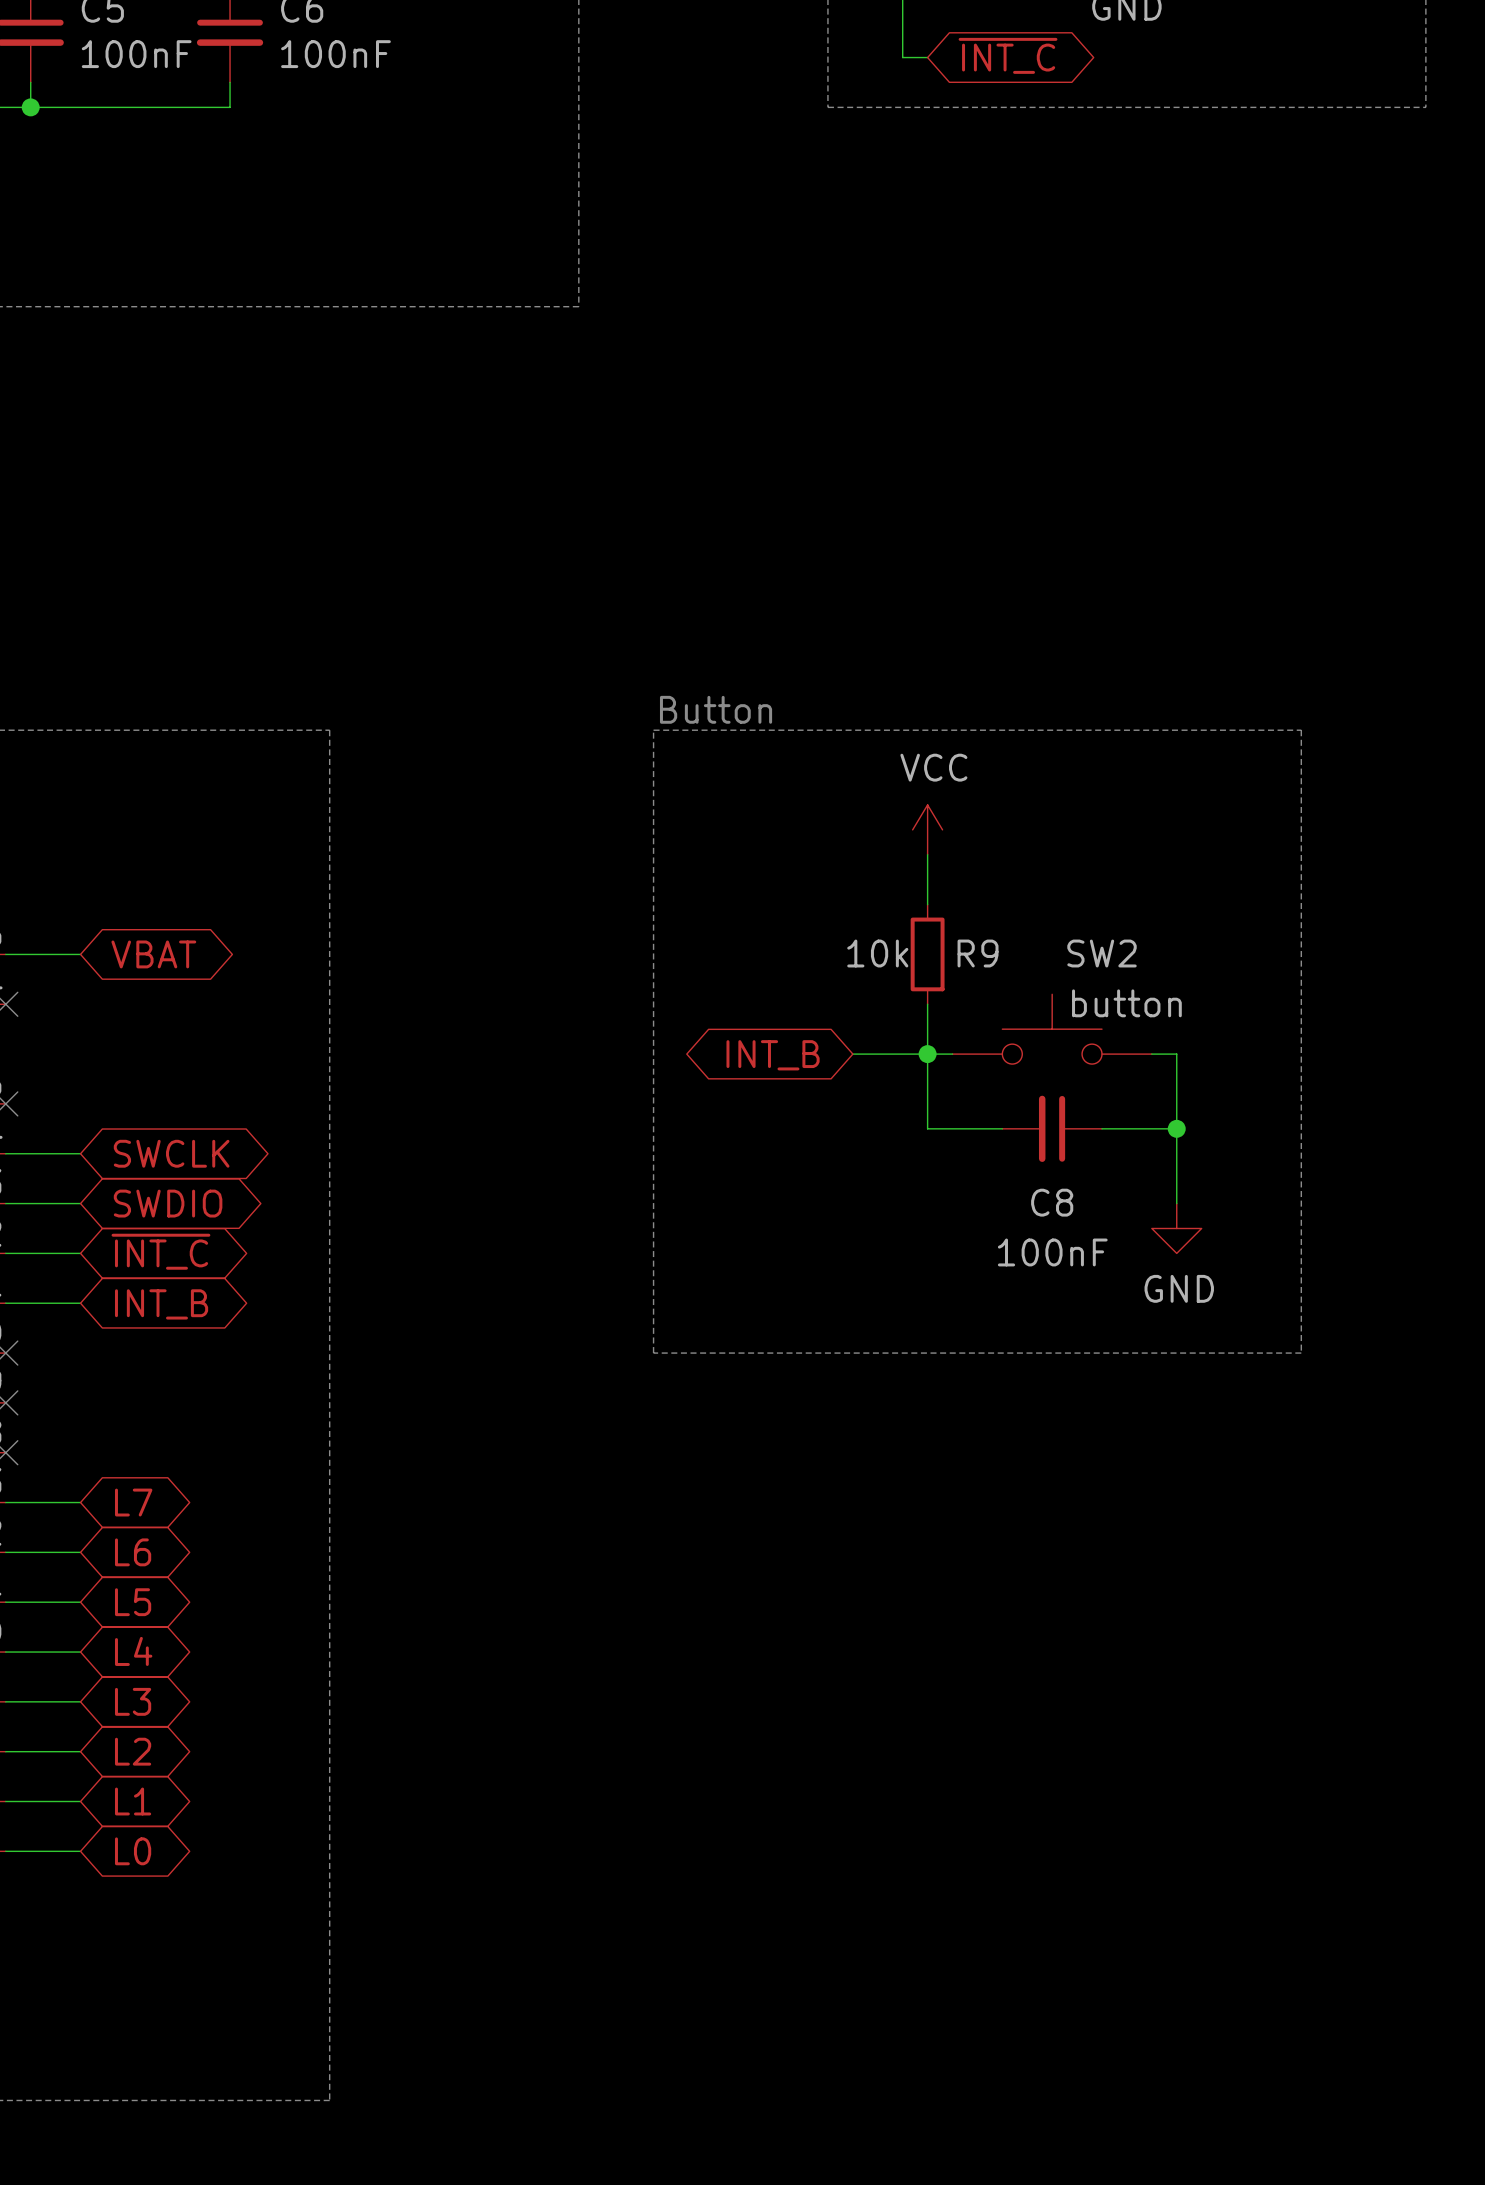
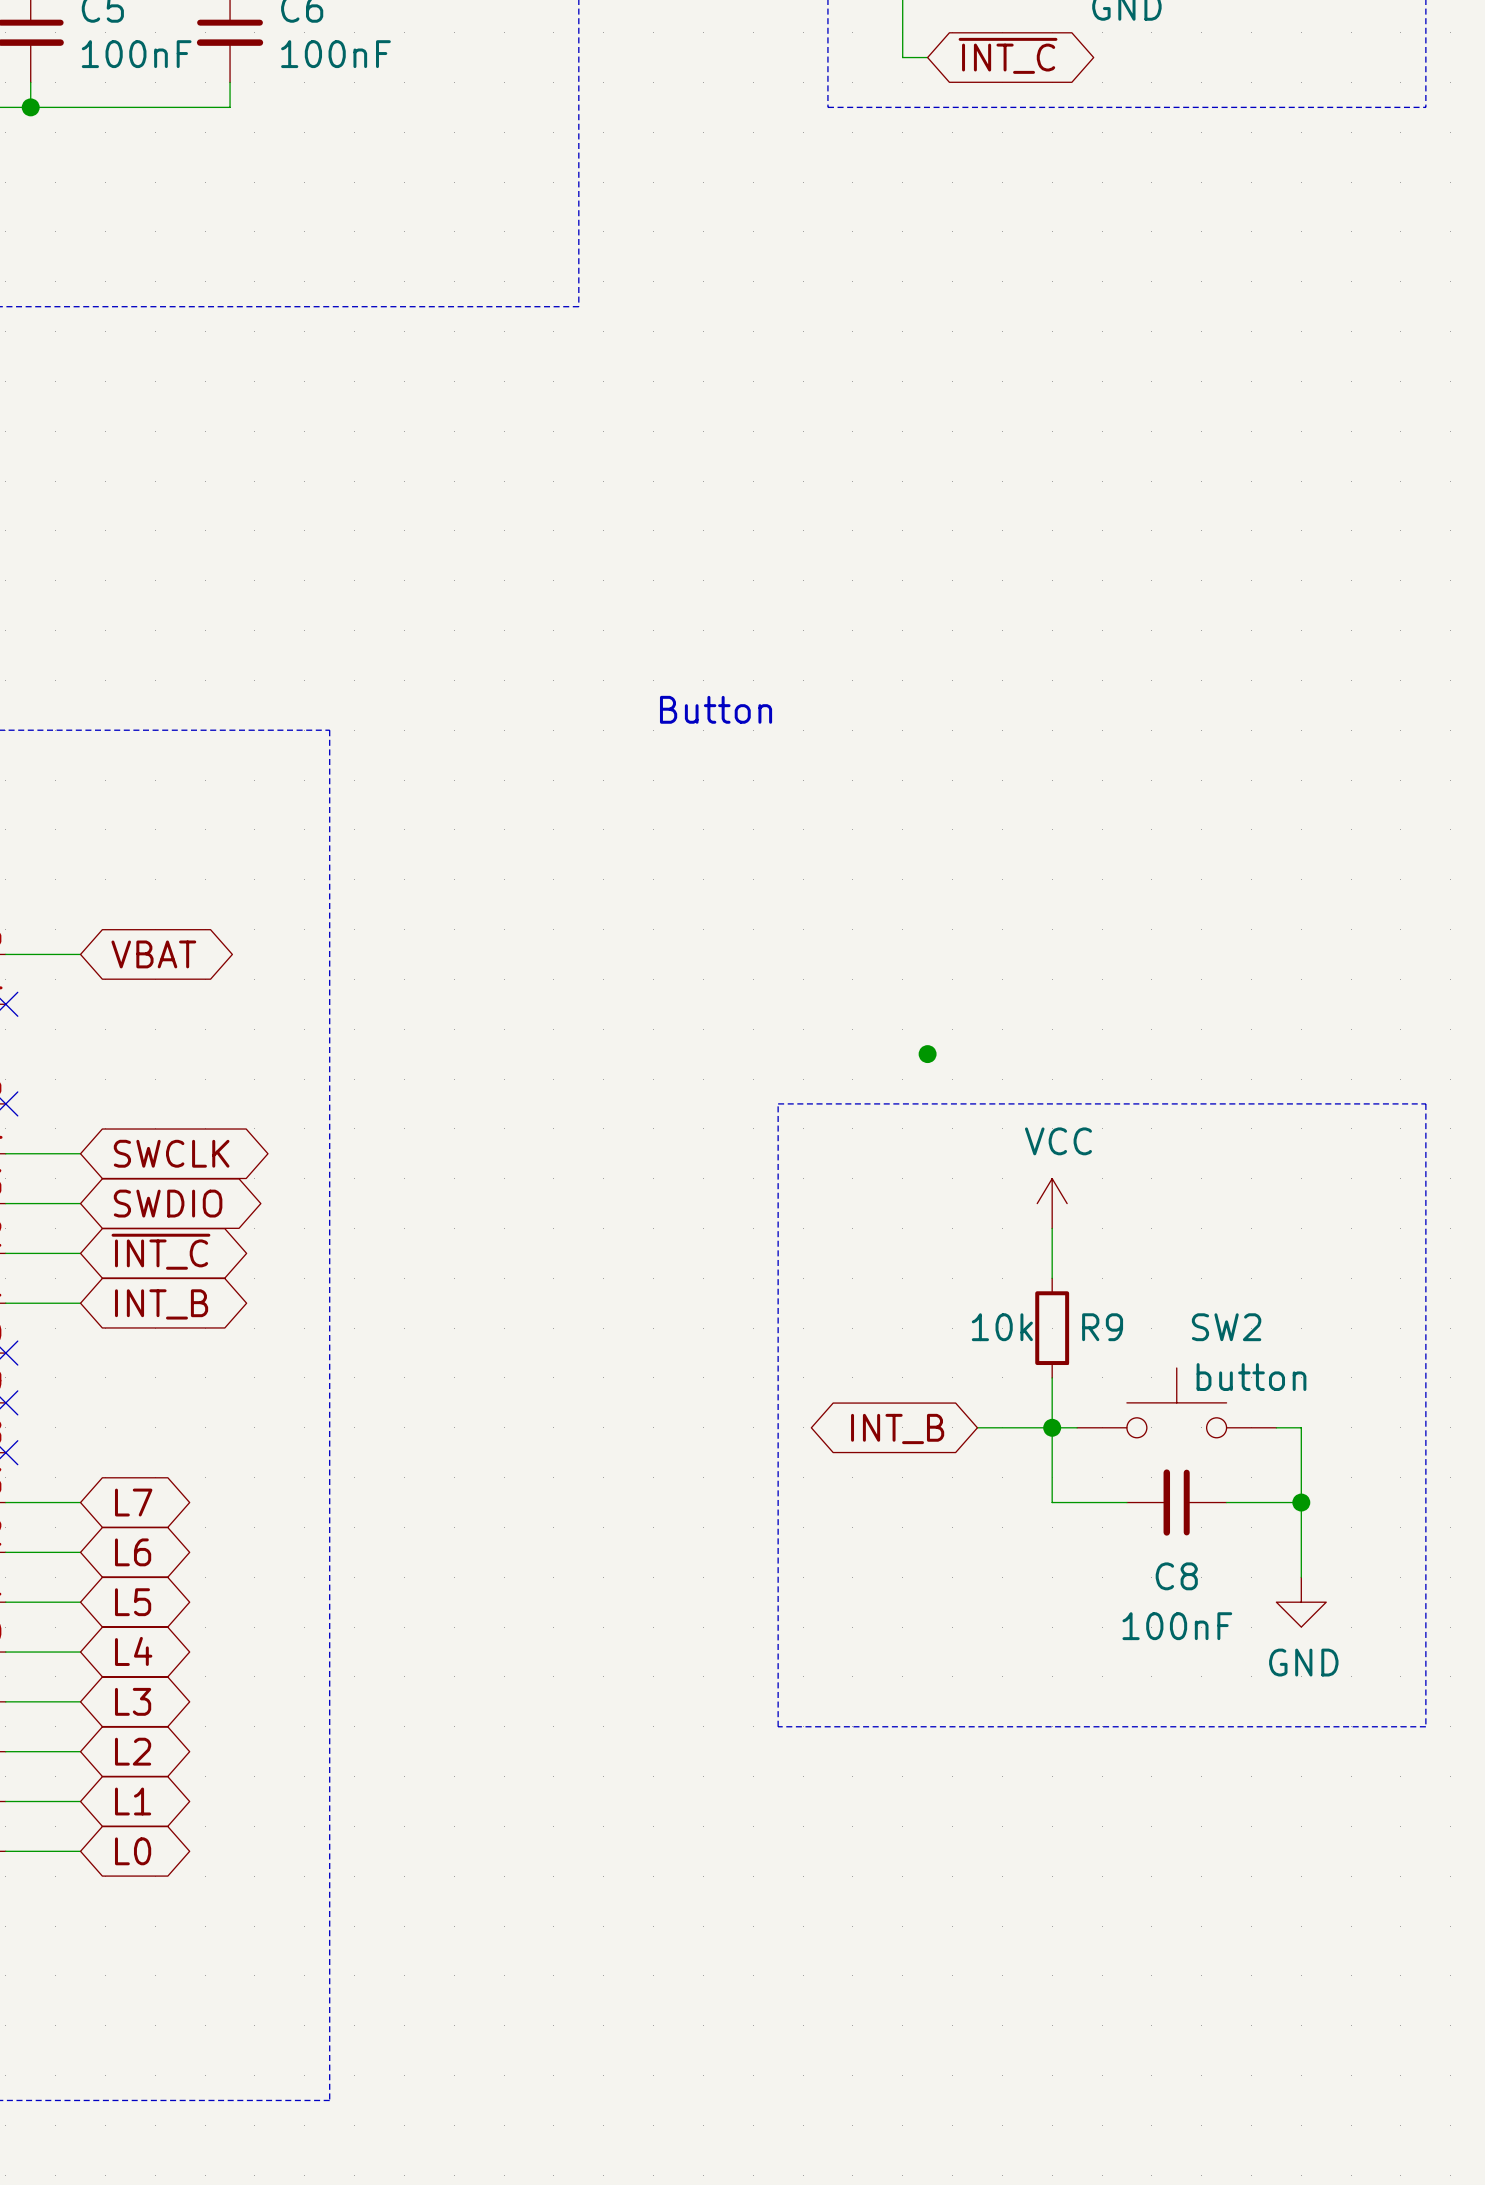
line: (653, 730) (1301, 730) (1301, 1353) (653, 1353) (653, 730) -> (778, 1103) (1425, 1103) (1425, 1726) (778, 1726) (778, 1103)
power symbol position: VCC (927, 829) -> VCC (1052, 1203)
wire: (927, 854) (927, 904) -> (1052, 1228) (1052, 1278)
R9 position: (927, 954) -> (1052, 1328)
wire: (927, 1004) (927, 1128) (1002, 1128) -> (1052, 1377) (1052, 1502) (1126, 1502)
SW2 position: (1052, 1029) -> (1176, 1402)
wire: (852, 1054) (952, 1054) -> (977, 1427) (1077, 1427)
wire: (1151, 1054) (1176, 1054) (1176, 1203) -> (1276, 1427) (1301, 1427) (1301, 1577)
global label position: INT_B (773, 1055) -> INT_B (897, 1428)
C8 position: (1052, 1128) -> (1176, 1502)
wire: (1102, 1128) (1176, 1128) -> (1226, 1502) (1301, 1502)
junction: (1176, 1128) -> none
power symbol position: GND (1176, 1228) -> GND (1301, 1602)
junction: none -> (1052, 1427)
junction: none -> (1301, 1502)

